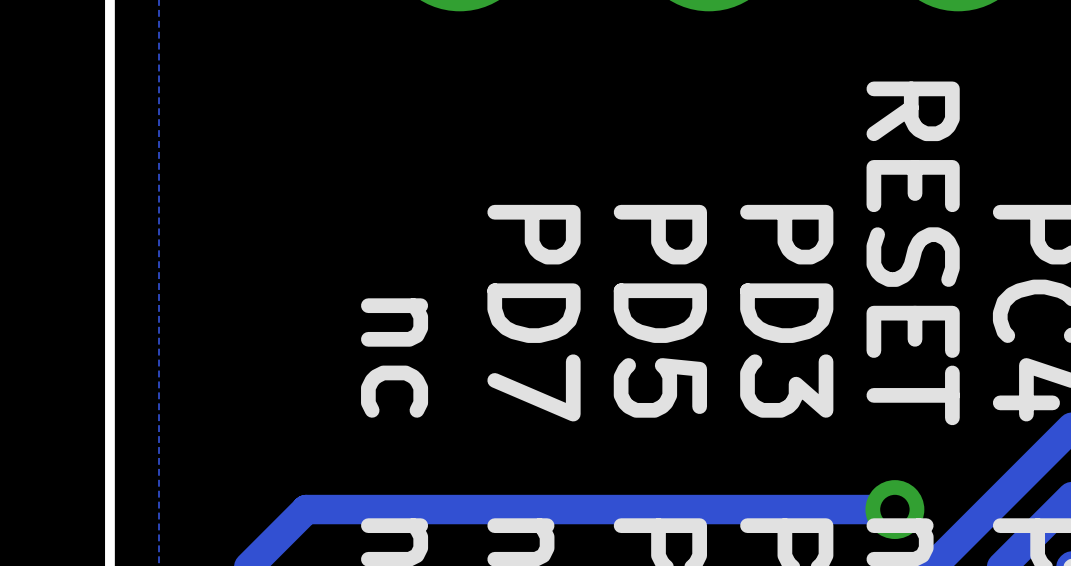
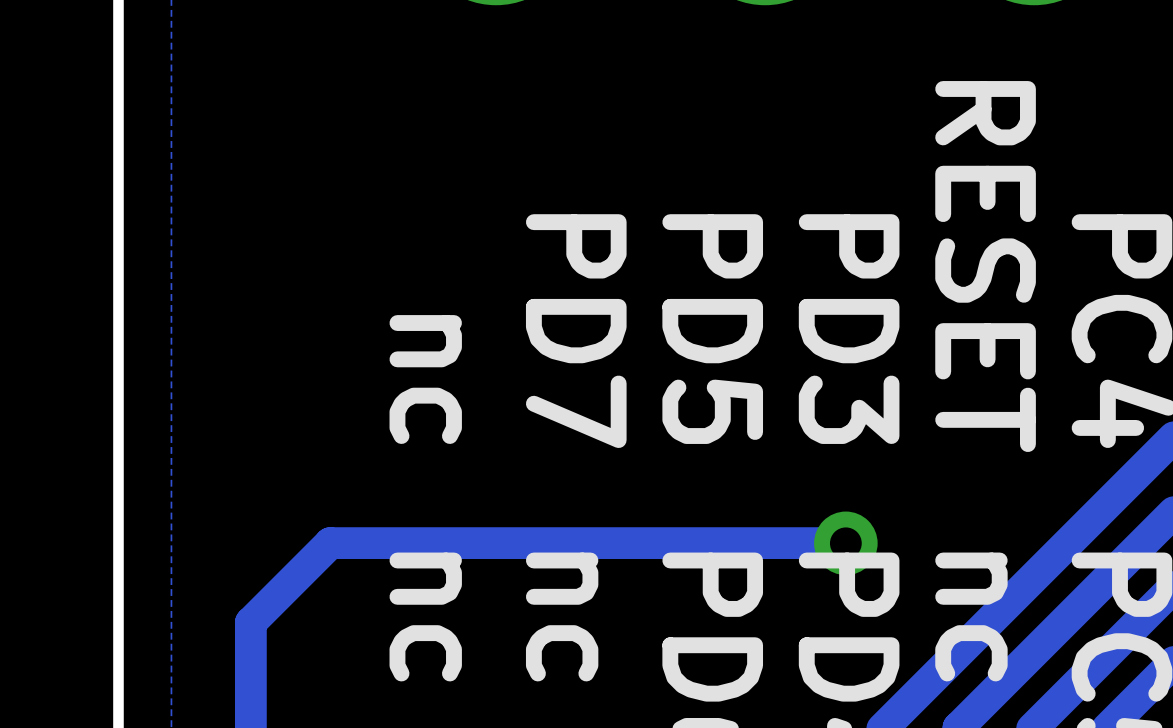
track: (894, 509) (783, 509) -> none
via position: (894, 509) -> (845, 543)

